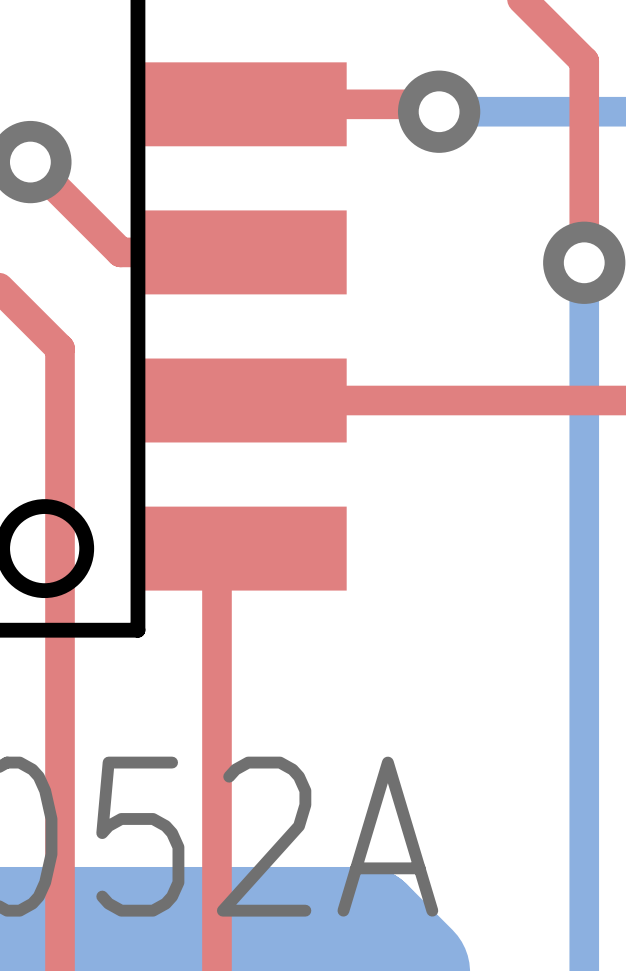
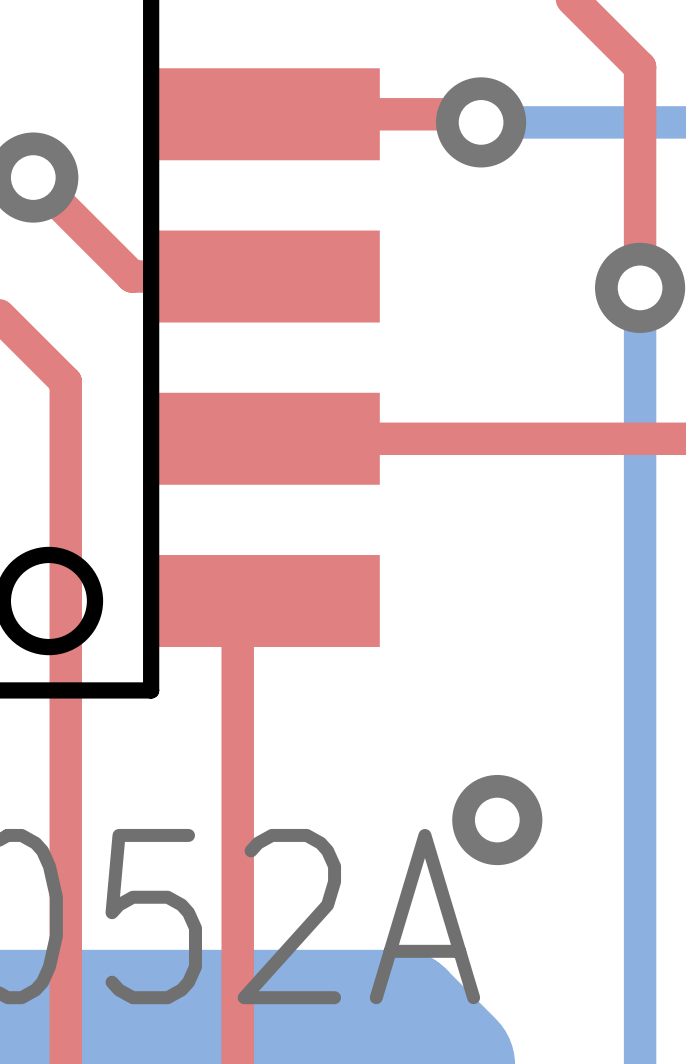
via: none -> (497, 820)

